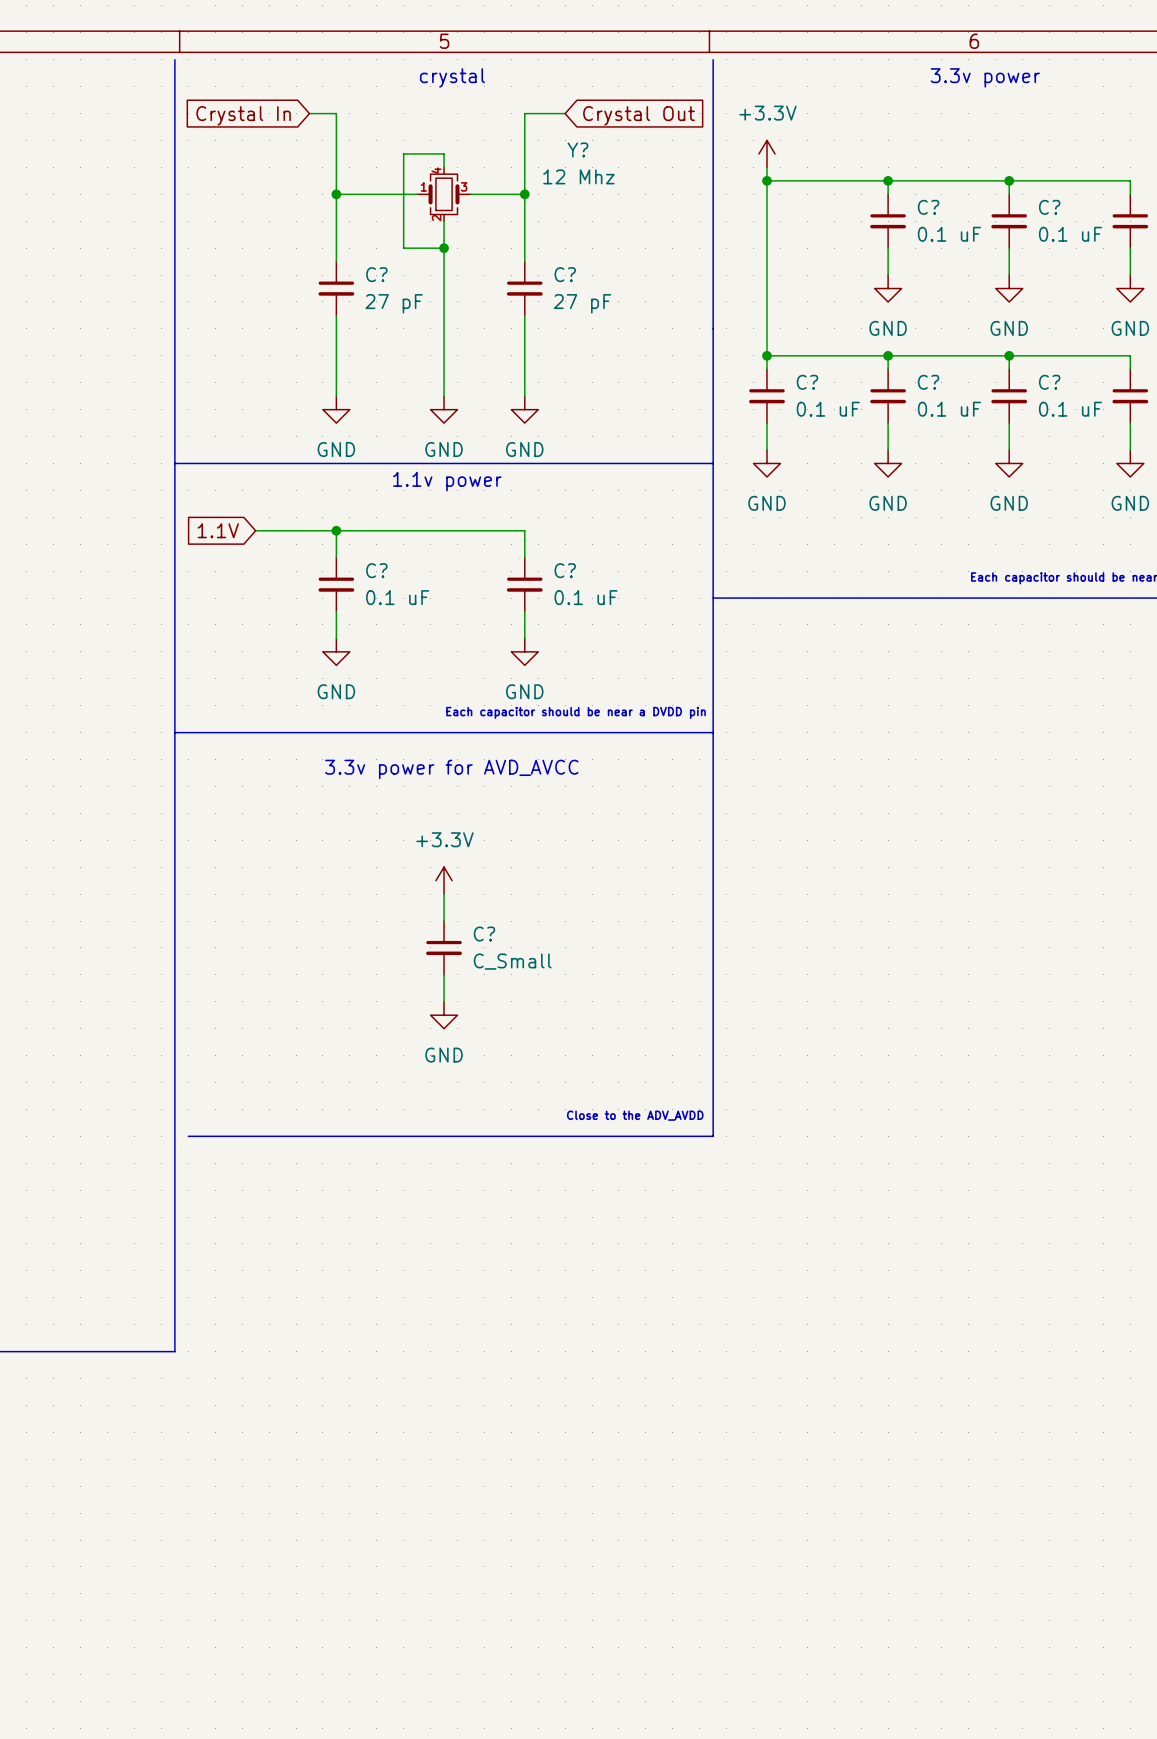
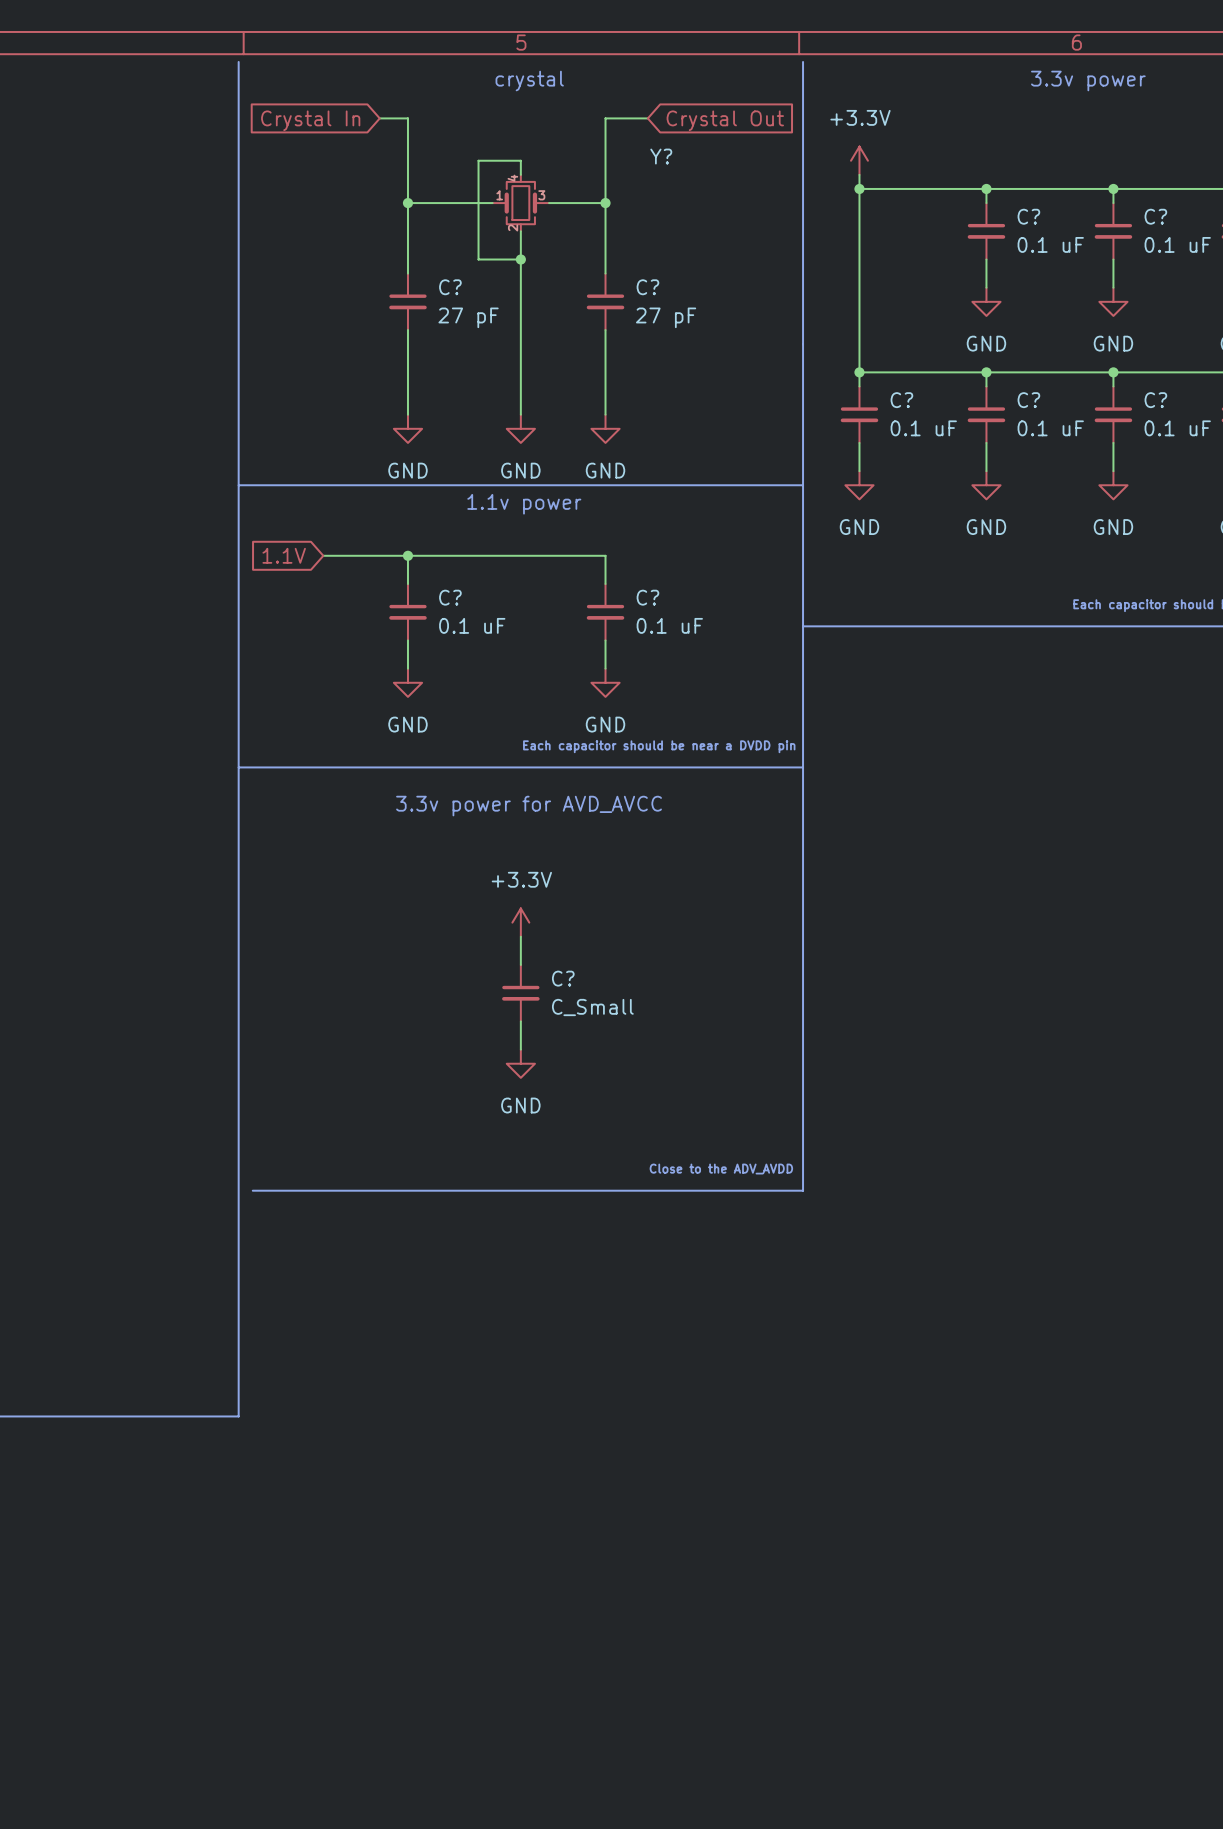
Y? value: 12 Mhz (578, 176) -> none

